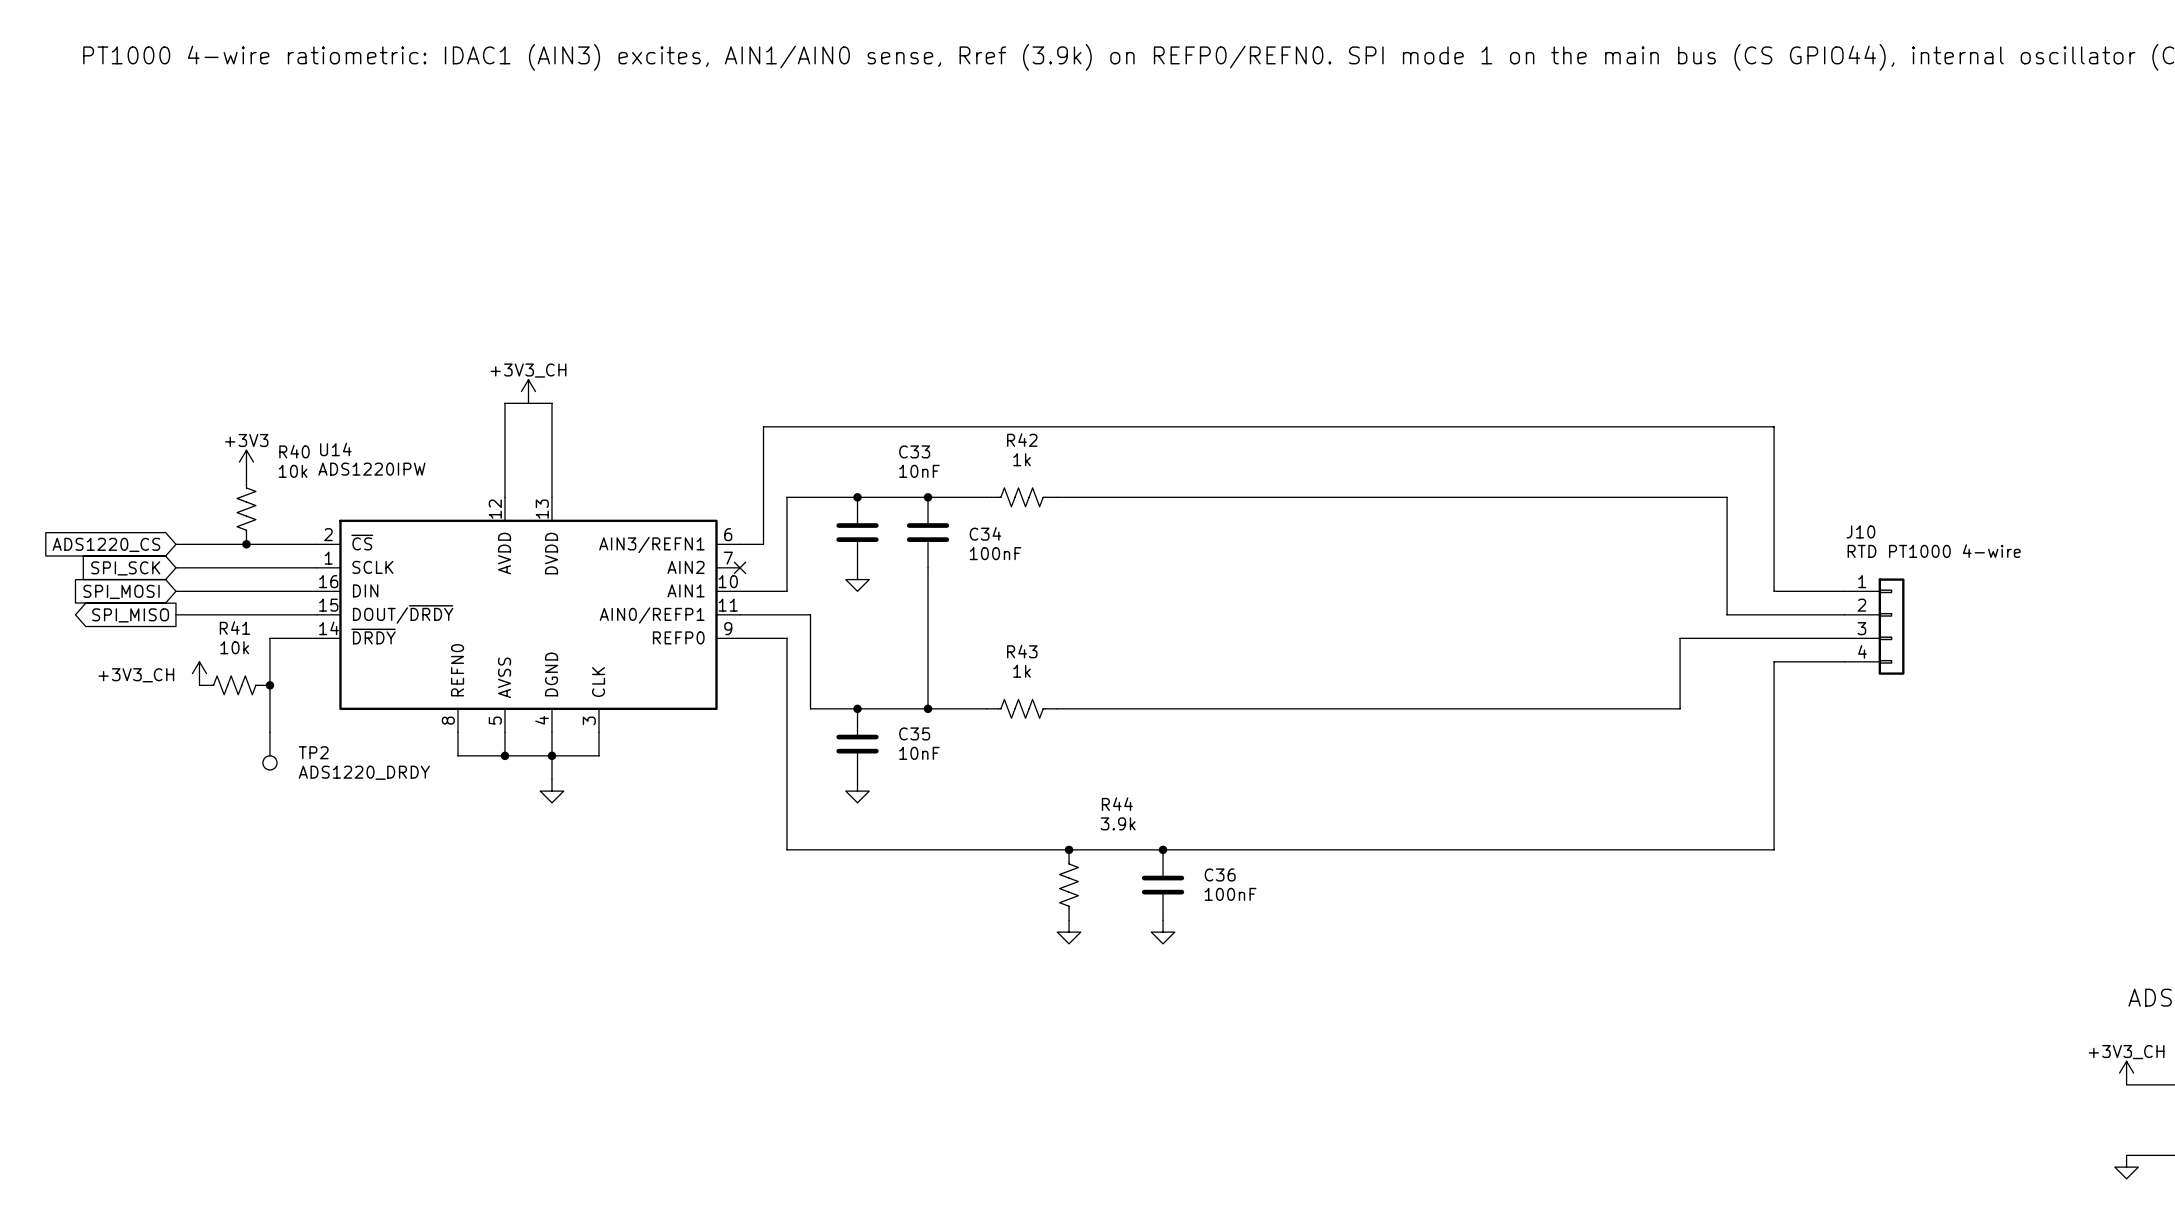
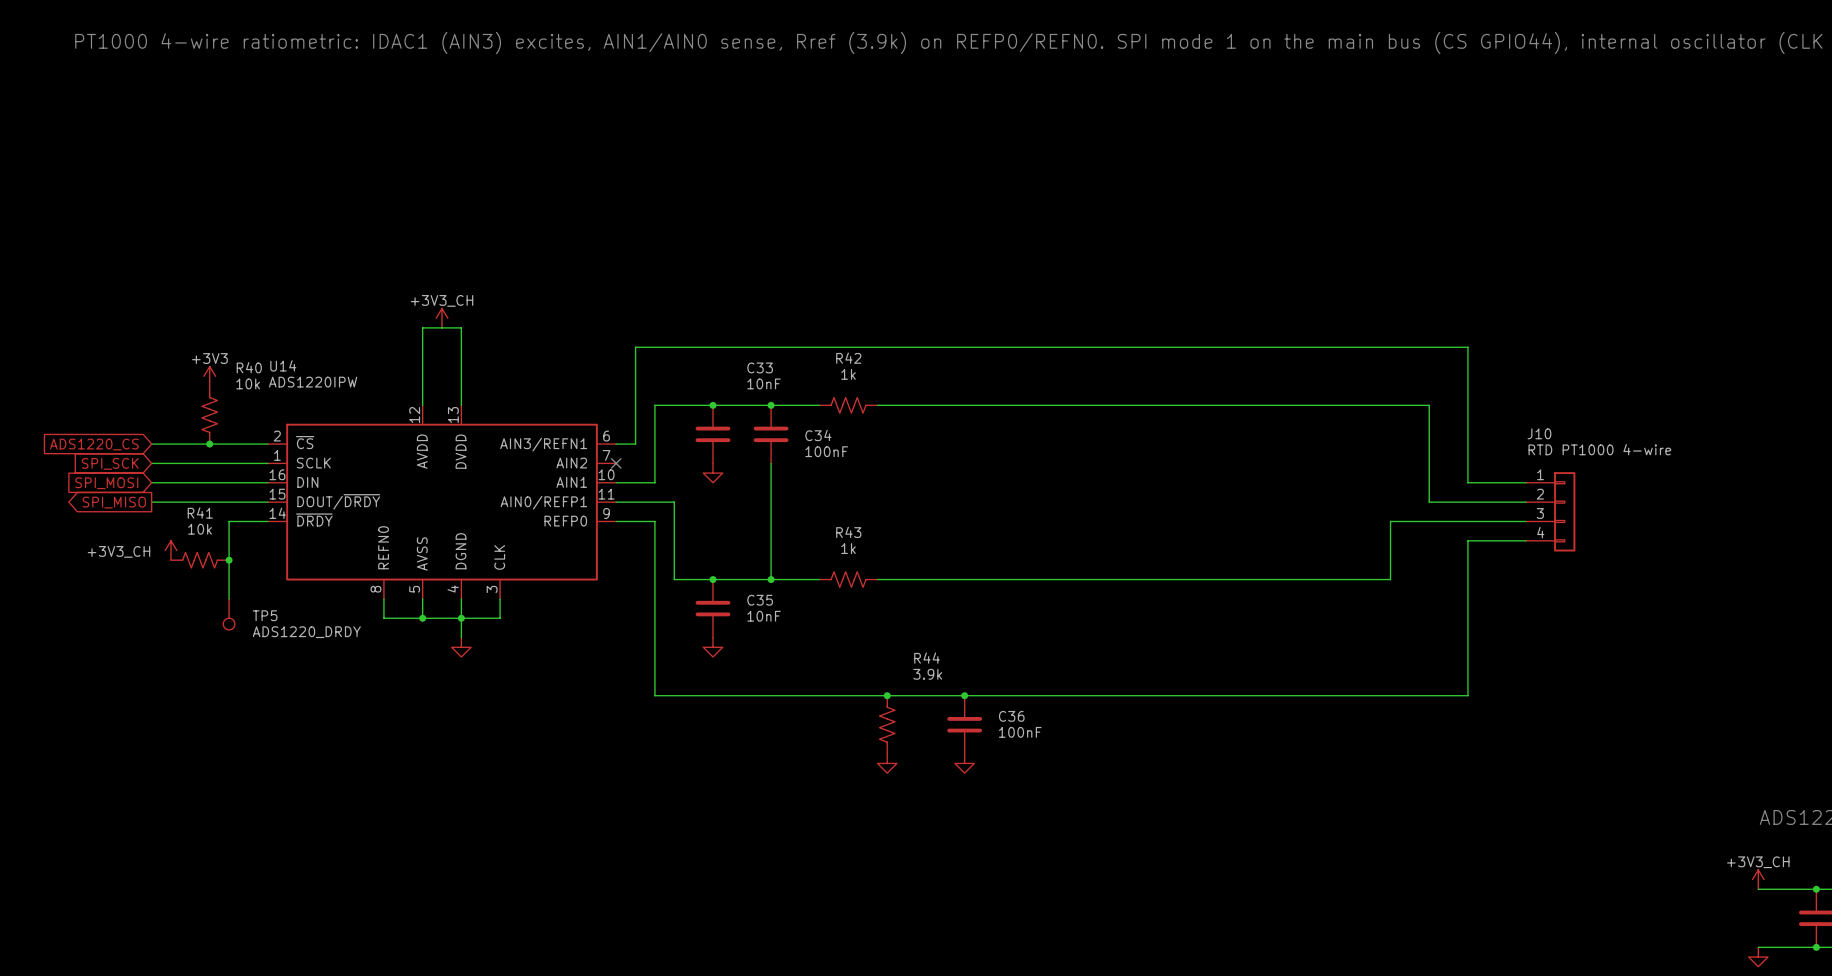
TP2 name: TP2 (313, 752) -> TP5 (265, 615)

